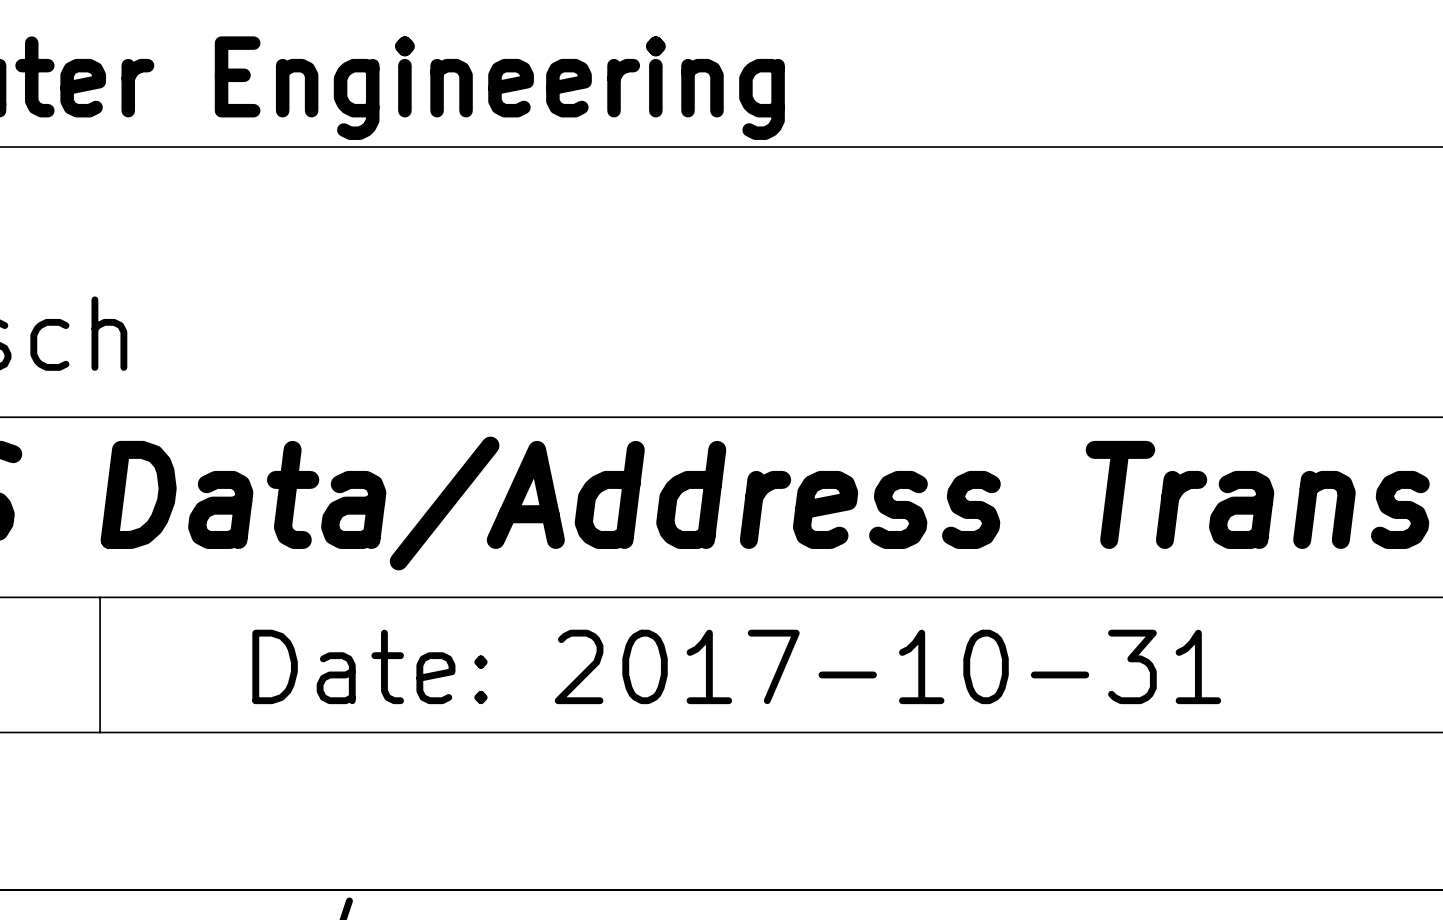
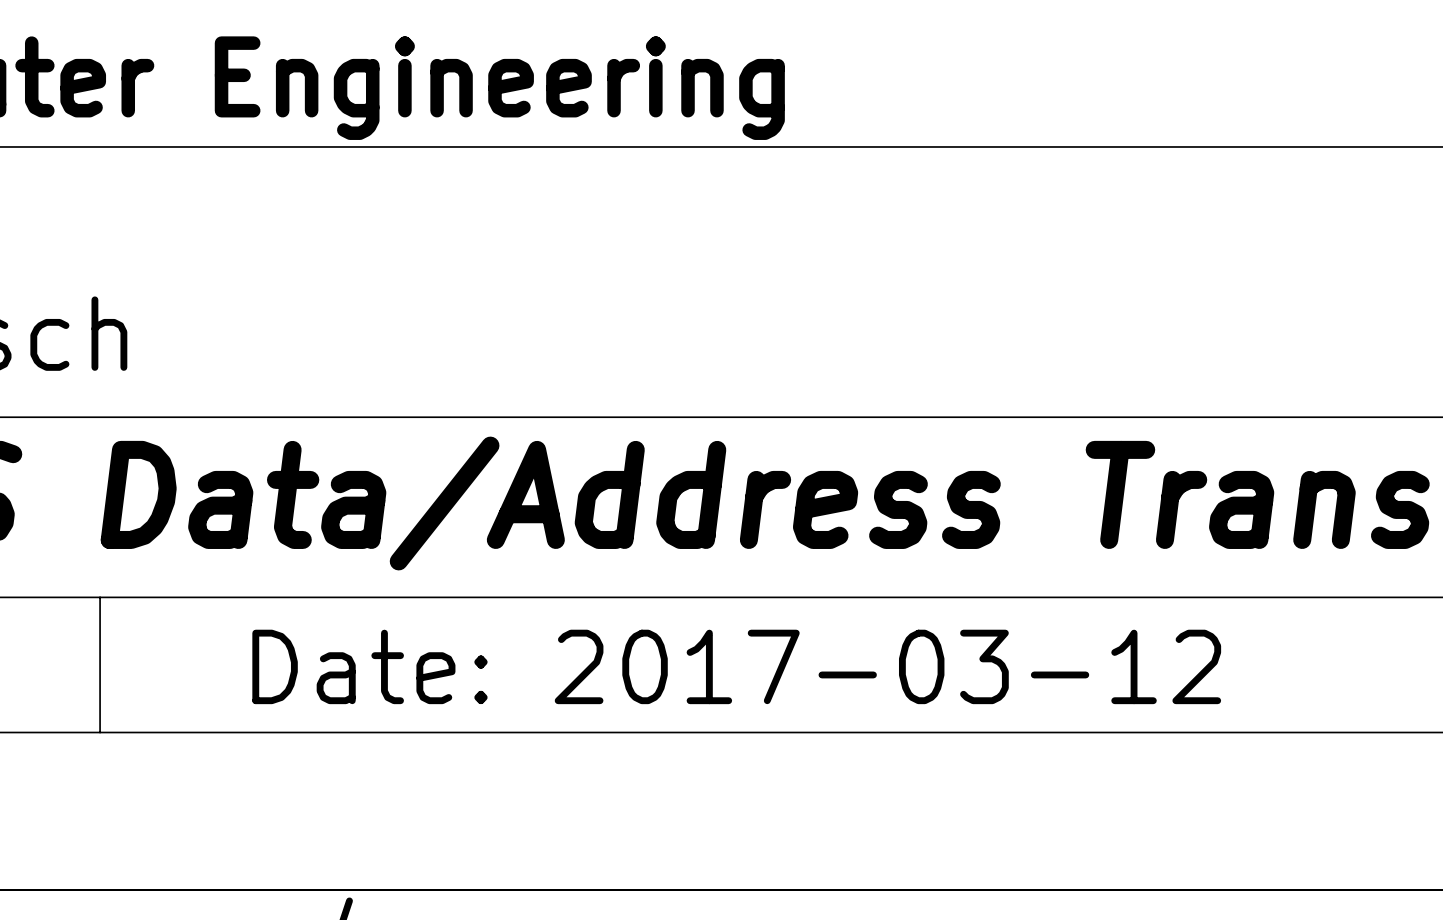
title block: Date: 2017-10-31 (736, 666) -> Date: 2017-03-12 (736, 666)

